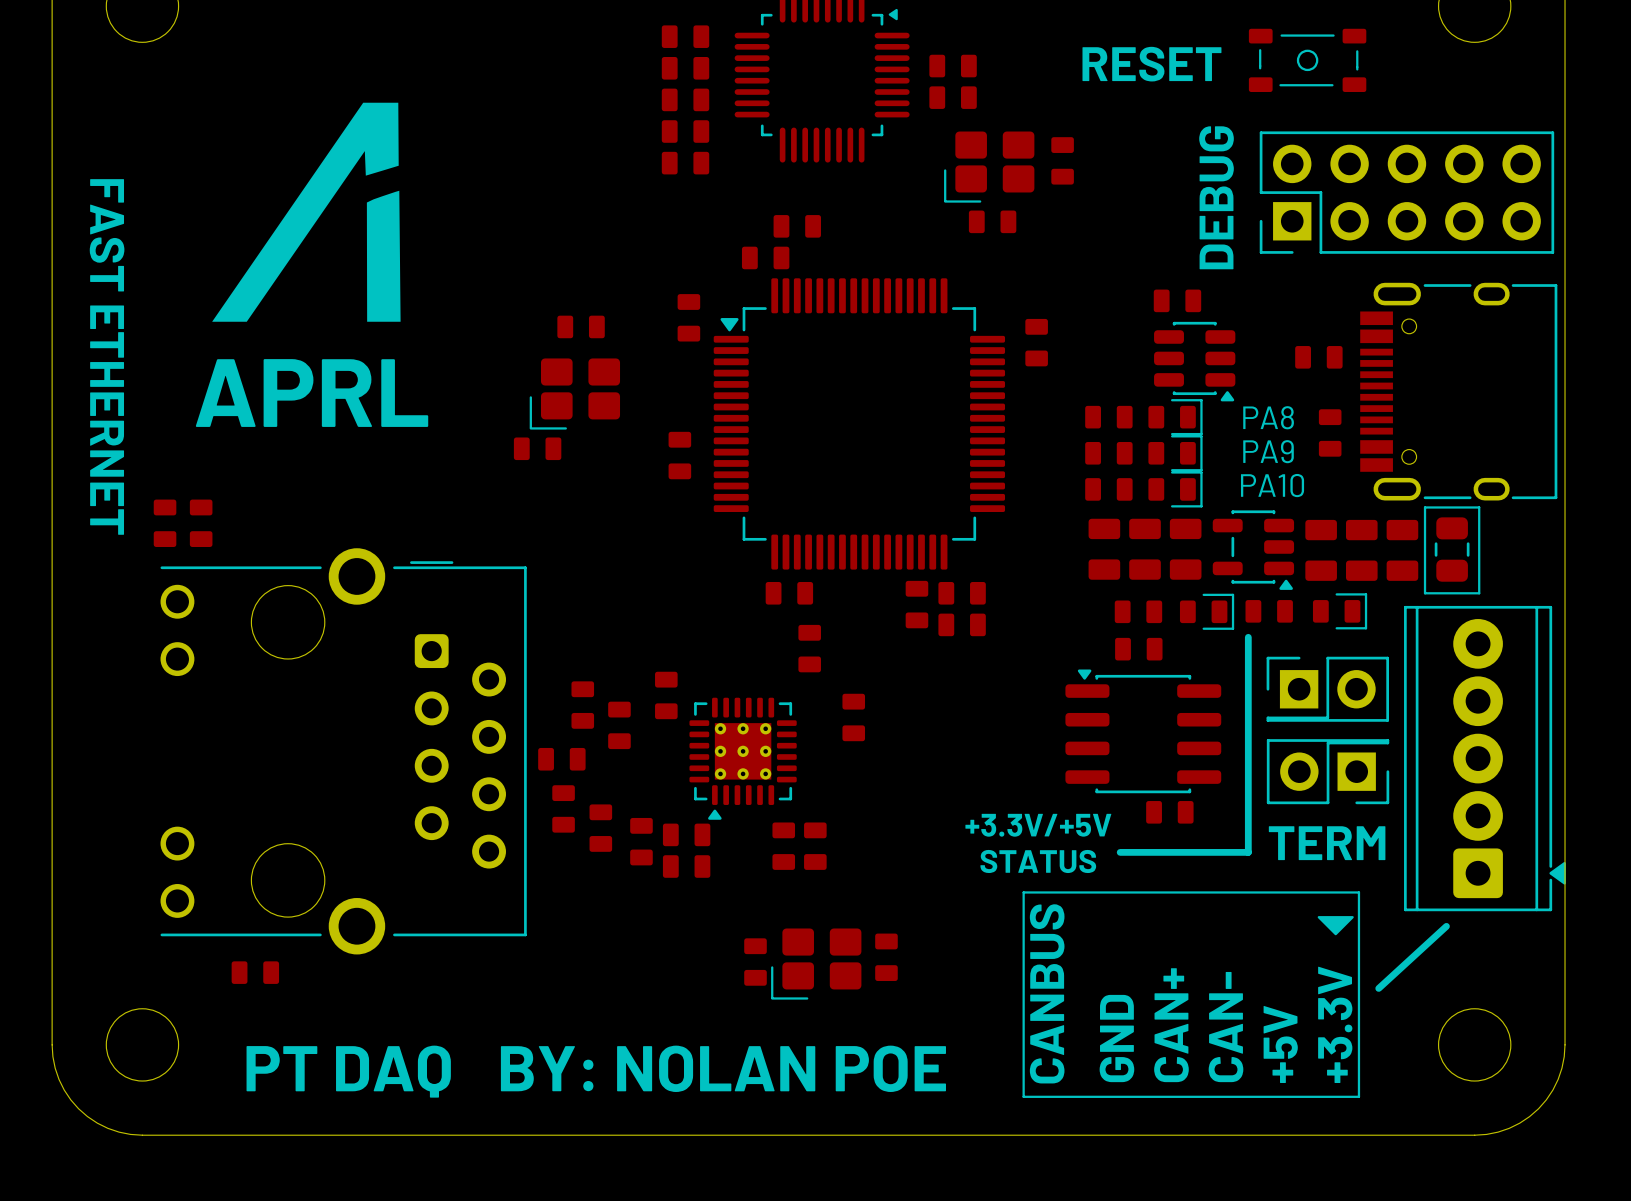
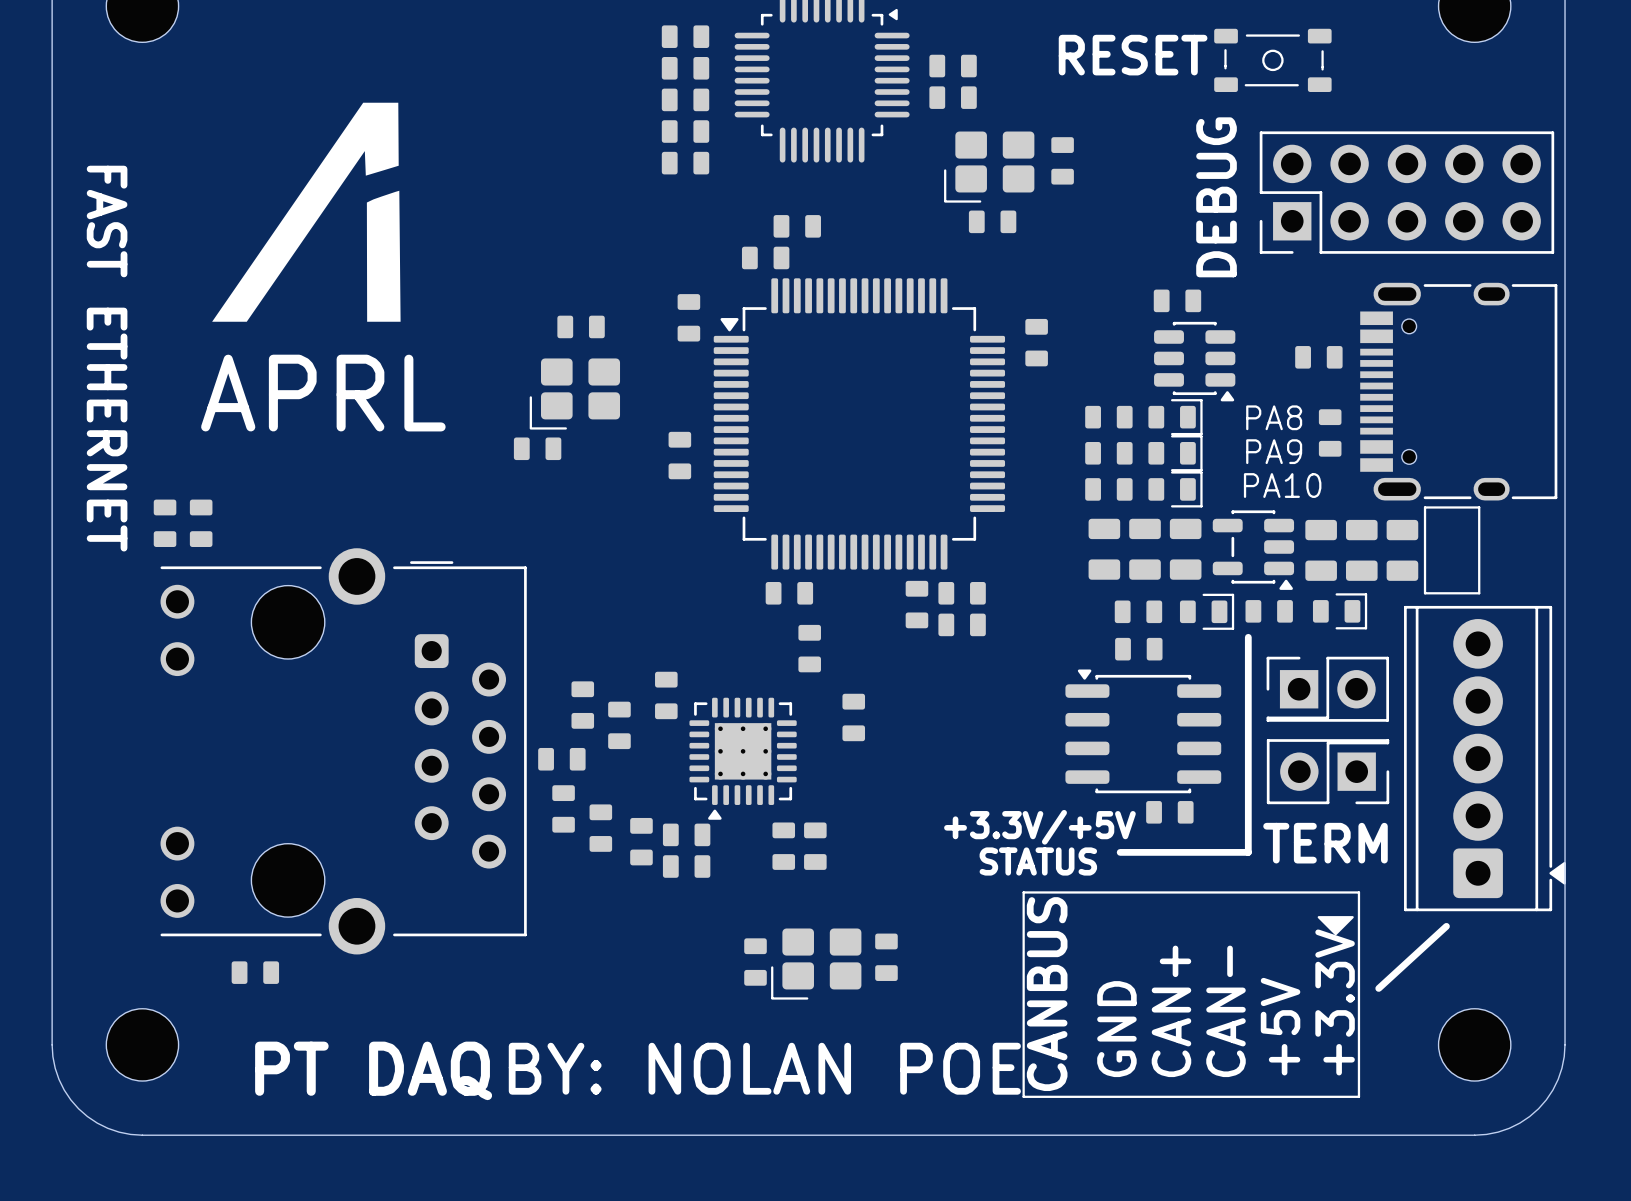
part position: (1307, 60) -> (1272, 60)
text position: RESET (1151, 64) -> RESET (1133, 55)
part: (1452, 549) -> none

